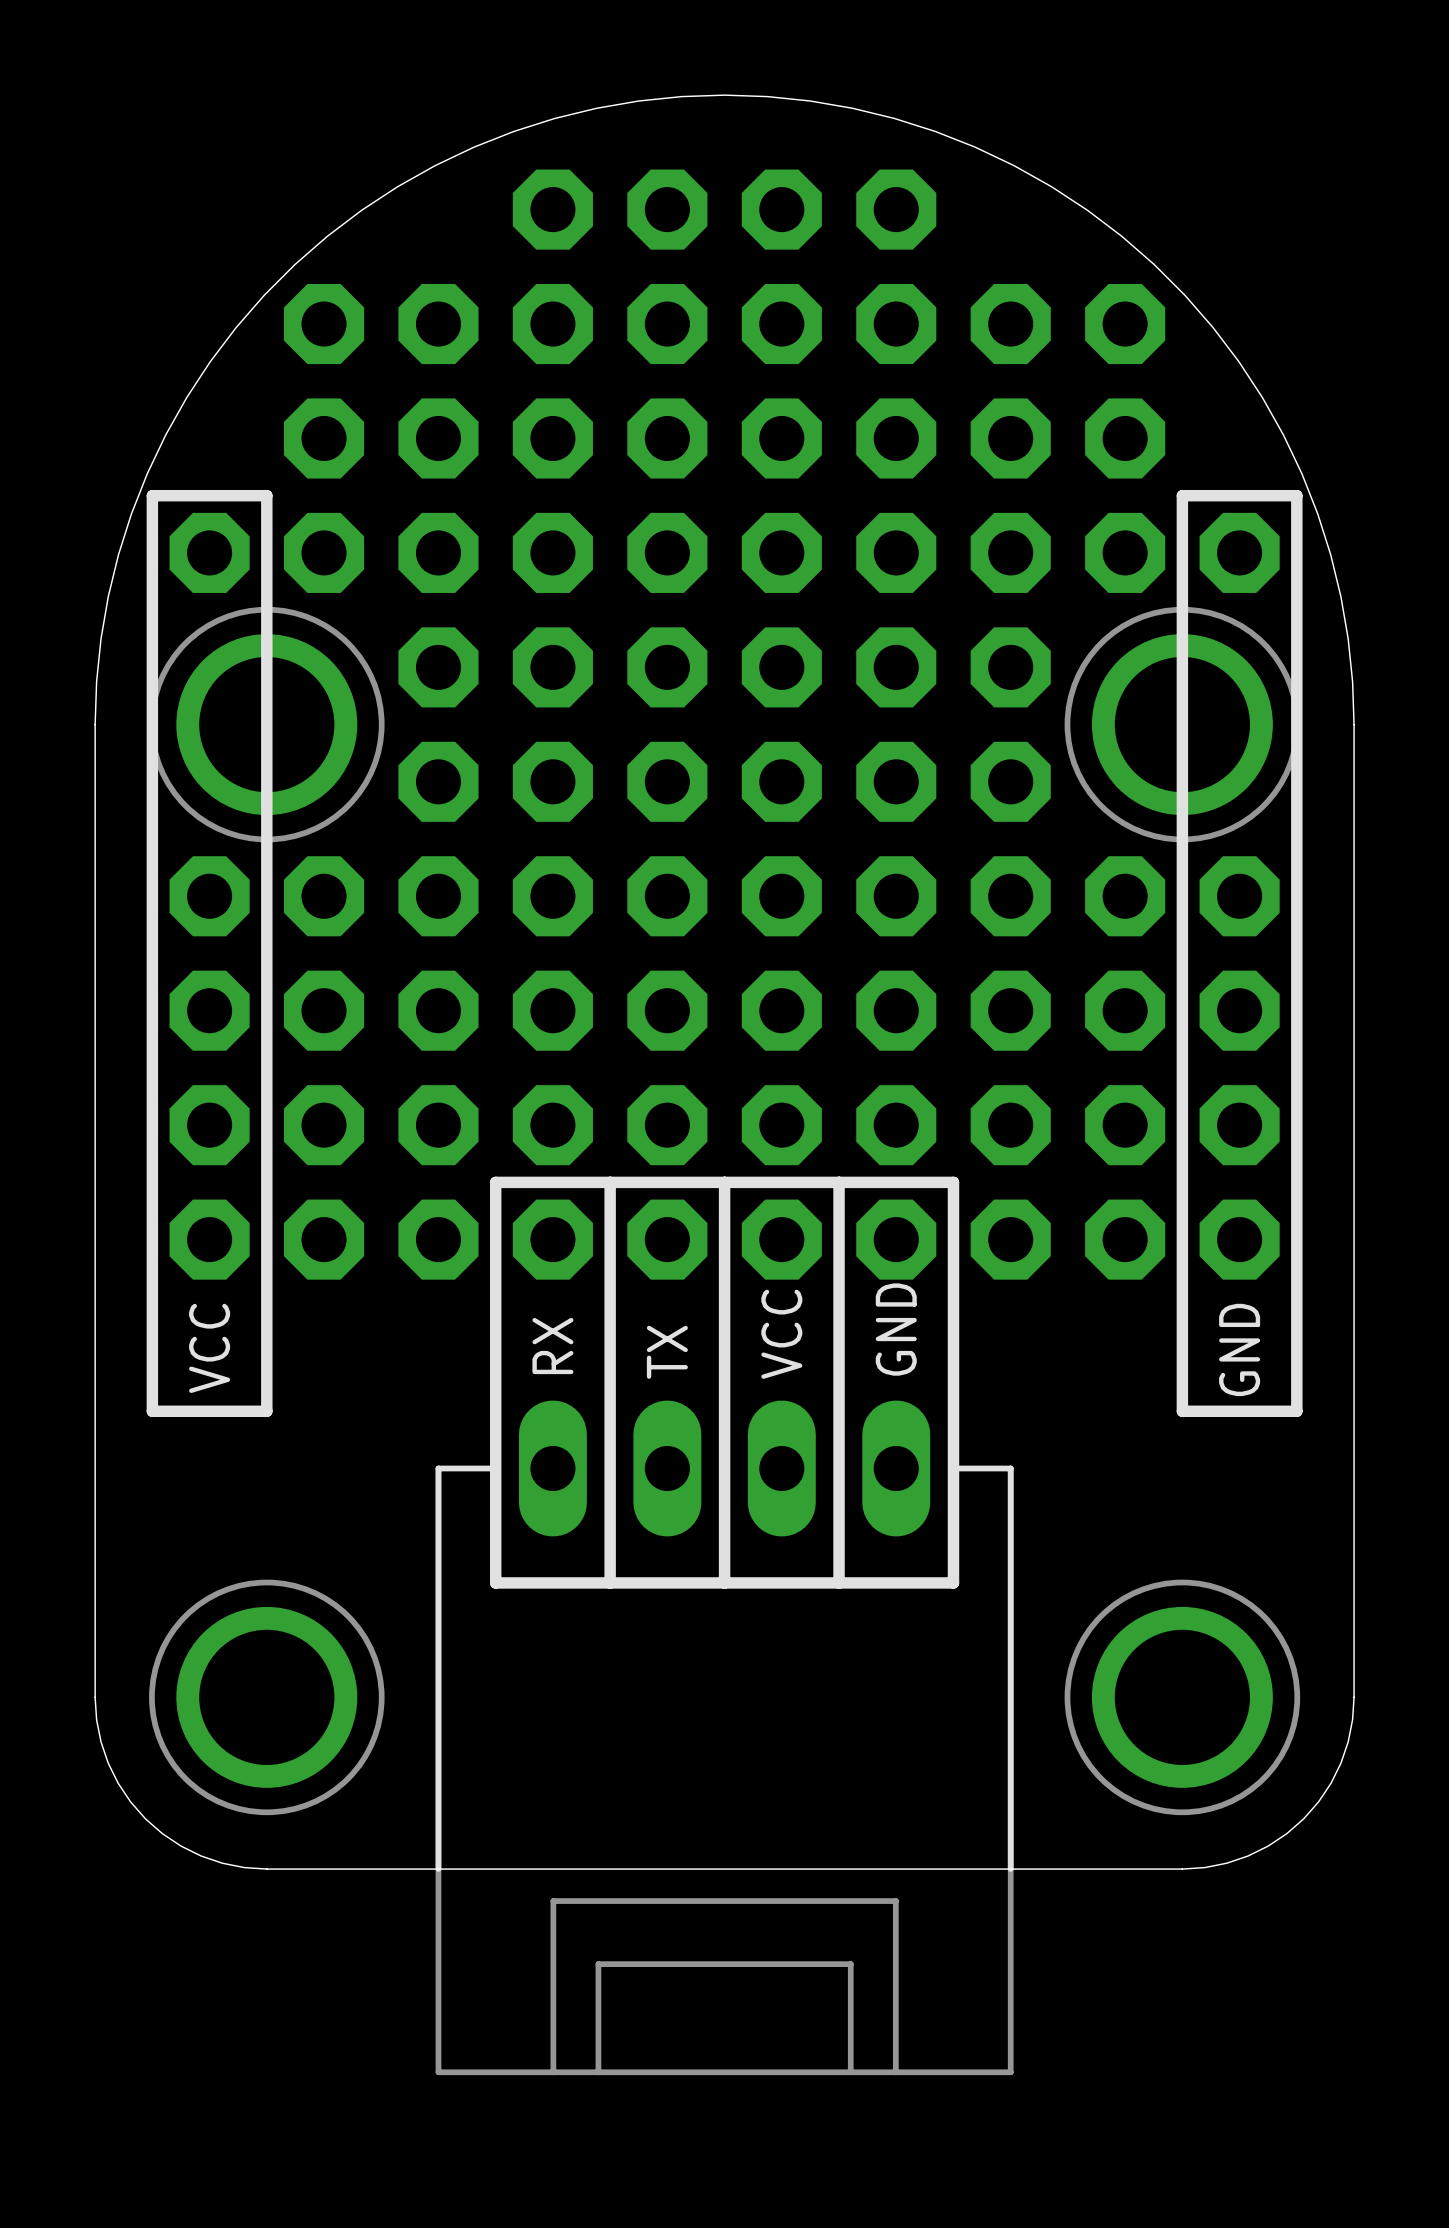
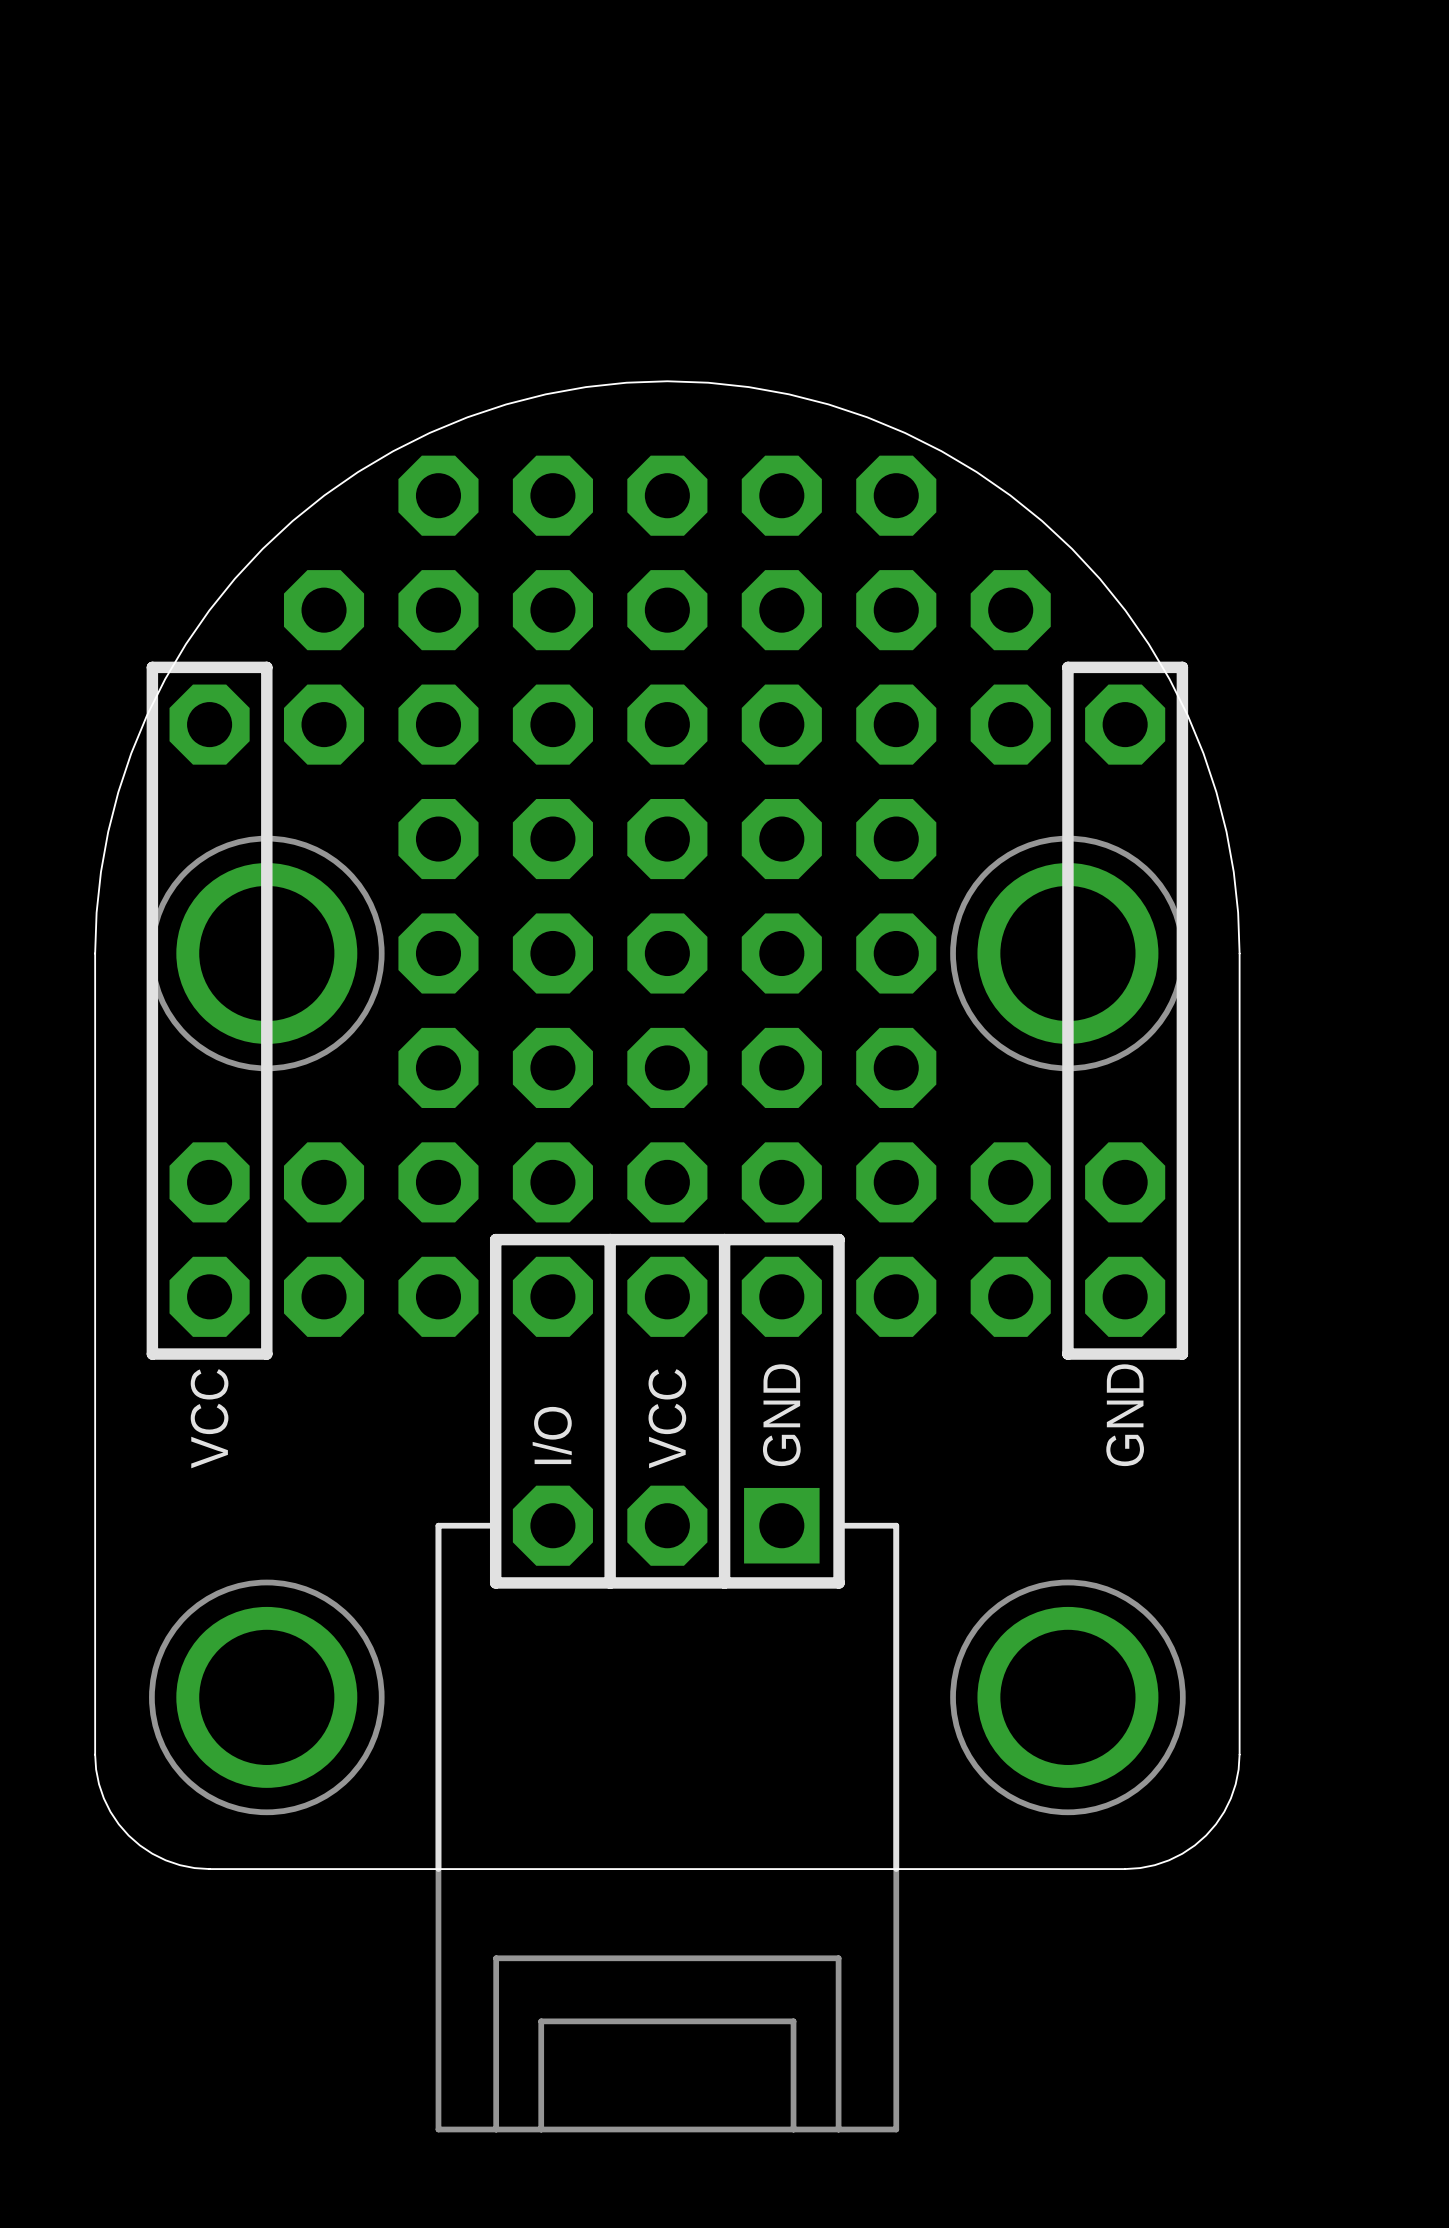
part: (209, 552) -> none
part: (1239, 552) -> none
line: (152, 667) (152, 495) (266, 495) (266, 667) -> (152, 667) (266, 667)
line: (1182, 667) (1182, 495) (1296, 495) (1296, 1411) (1182, 1411) (1182, 1354) -> (1182, 667) (1067, 667) (1067, 1354) (1182, 1354)
part: none -> (209, 724)
part: none -> (1125, 724)
part: (209, 896) -> none
part: (1239, 896) -> none
part: (209, 1010) -> none
part: (1239, 1010) -> none
part: (724, 1085) -> none
part: (209, 1125) -> none
part: (1239, 1125) -> none
part: none -> (209, 1182)
line: (610, 1182) (610, 1239) -> none
line: (724, 1182) (724, 1239) -> none
line: (839, 1182) (839, 1239) -> none
part: none -> (1125, 1182)
part footprint: [627, 1199, 708, 1280] -> [95, 381, 1240, 2133]
part: (209, 1239) -> none
line: (495, 1239) (495, 1182) (953, 1182) (953, 1582) (839, 1582) -> (495, 1239) (839, 1239)
part position: (552, 1239) -> (552, 1296)
part position: (781, 1239) -> (781, 1296)
part: (896, 1239) -> none
part: (1239, 1239) -> none
part: none -> (209, 1296)
part: none -> (667, 1296)
part: none -> (1125, 1296)
text position: VCC (209, 1348) -> VCC (209, 1418)
text position: GND (1239, 1349) -> GND (1125, 1415)
line: (152, 1354) (152, 1411) (266, 1411) (266, 1354) -> (152, 1354) (266, 1354)

